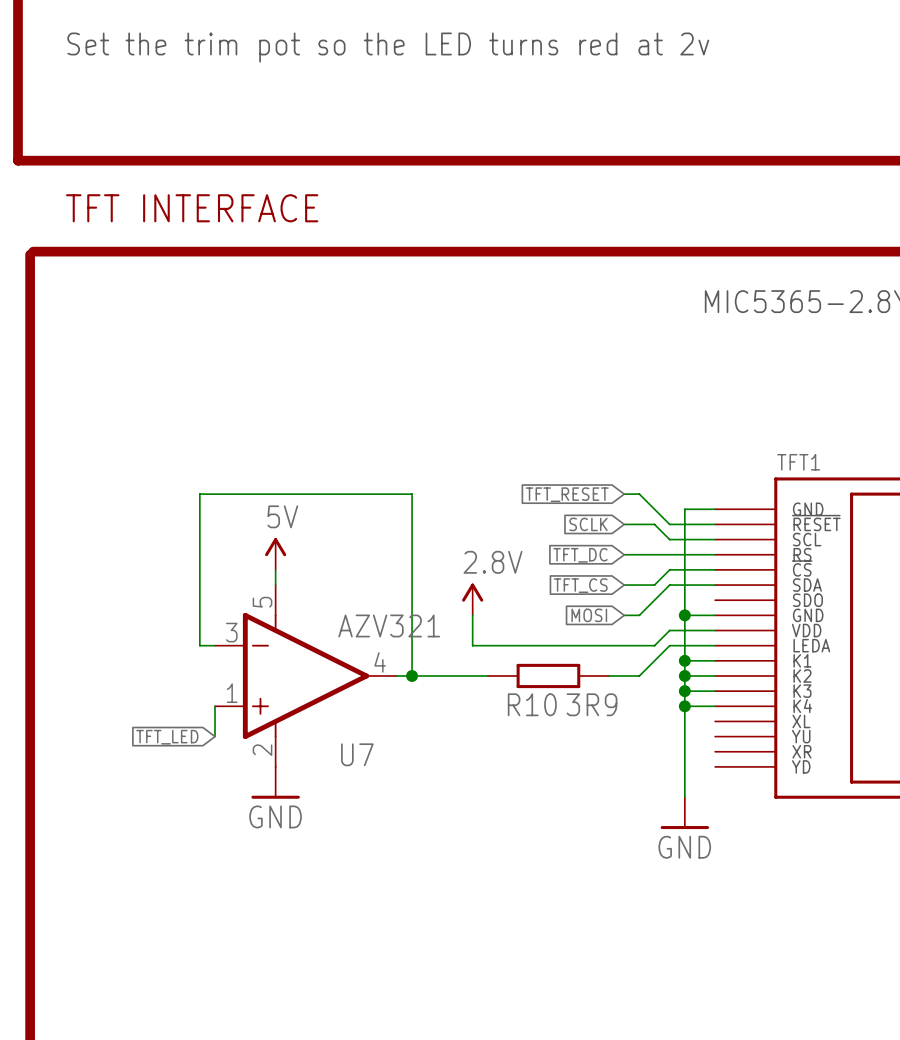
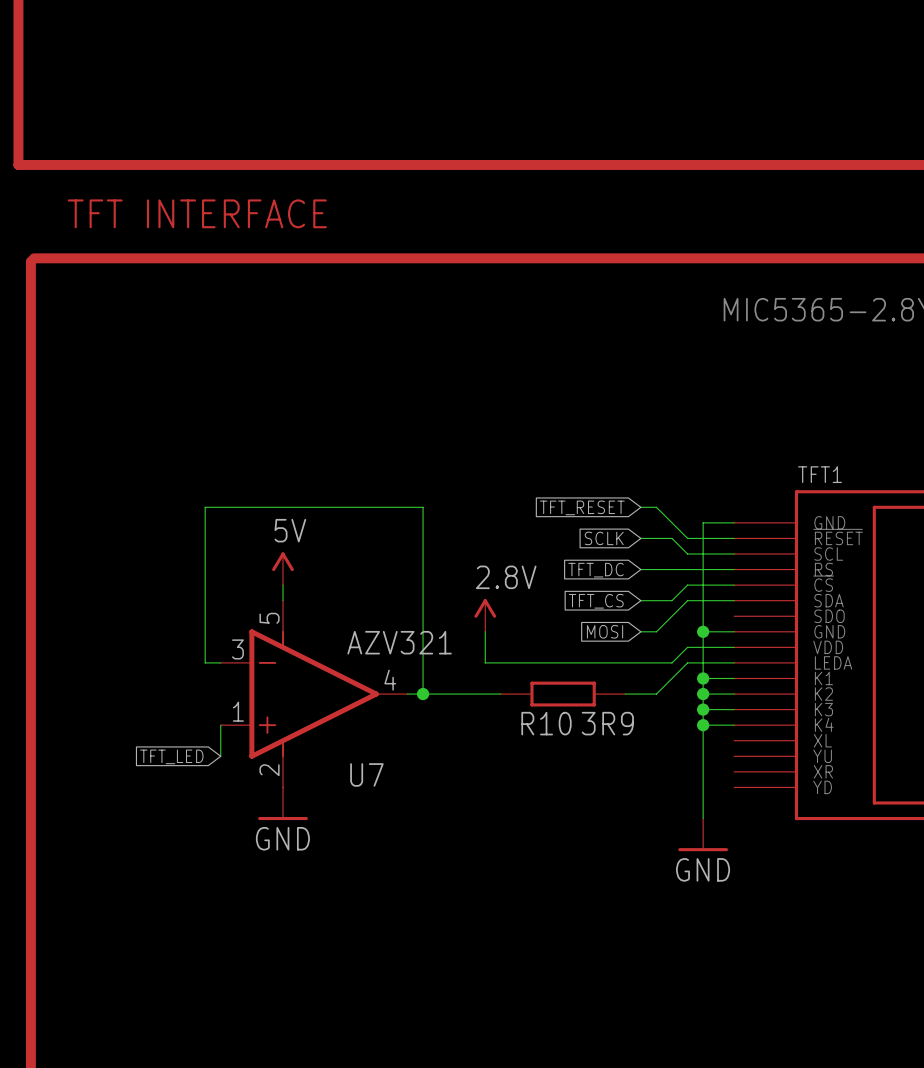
text: Set the trim pot so the LED turns red at 2v (388, 47) -> none

